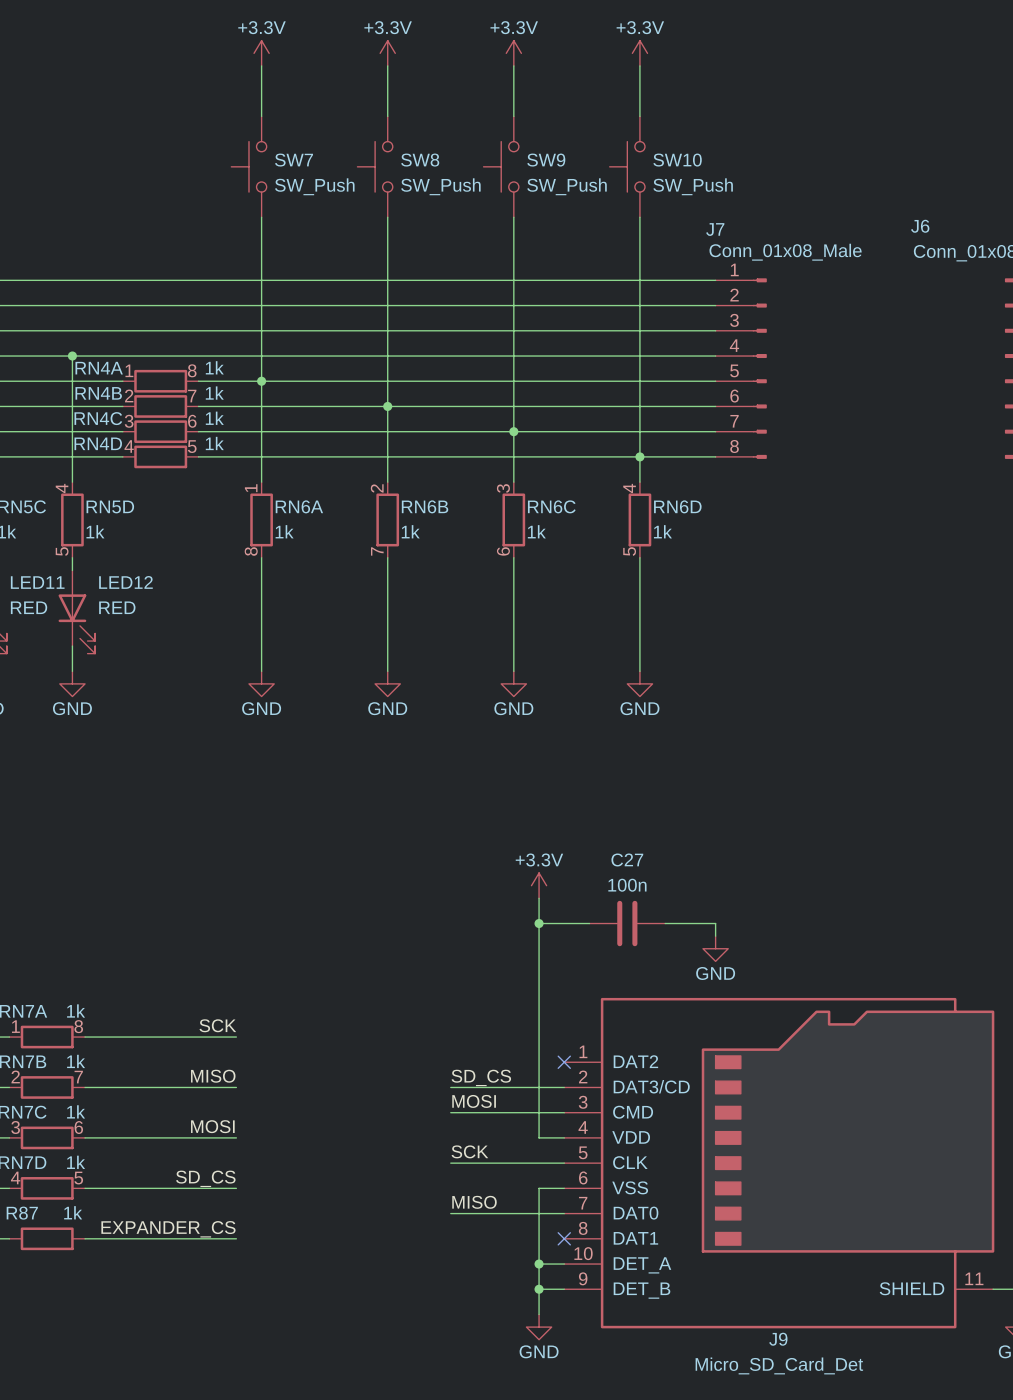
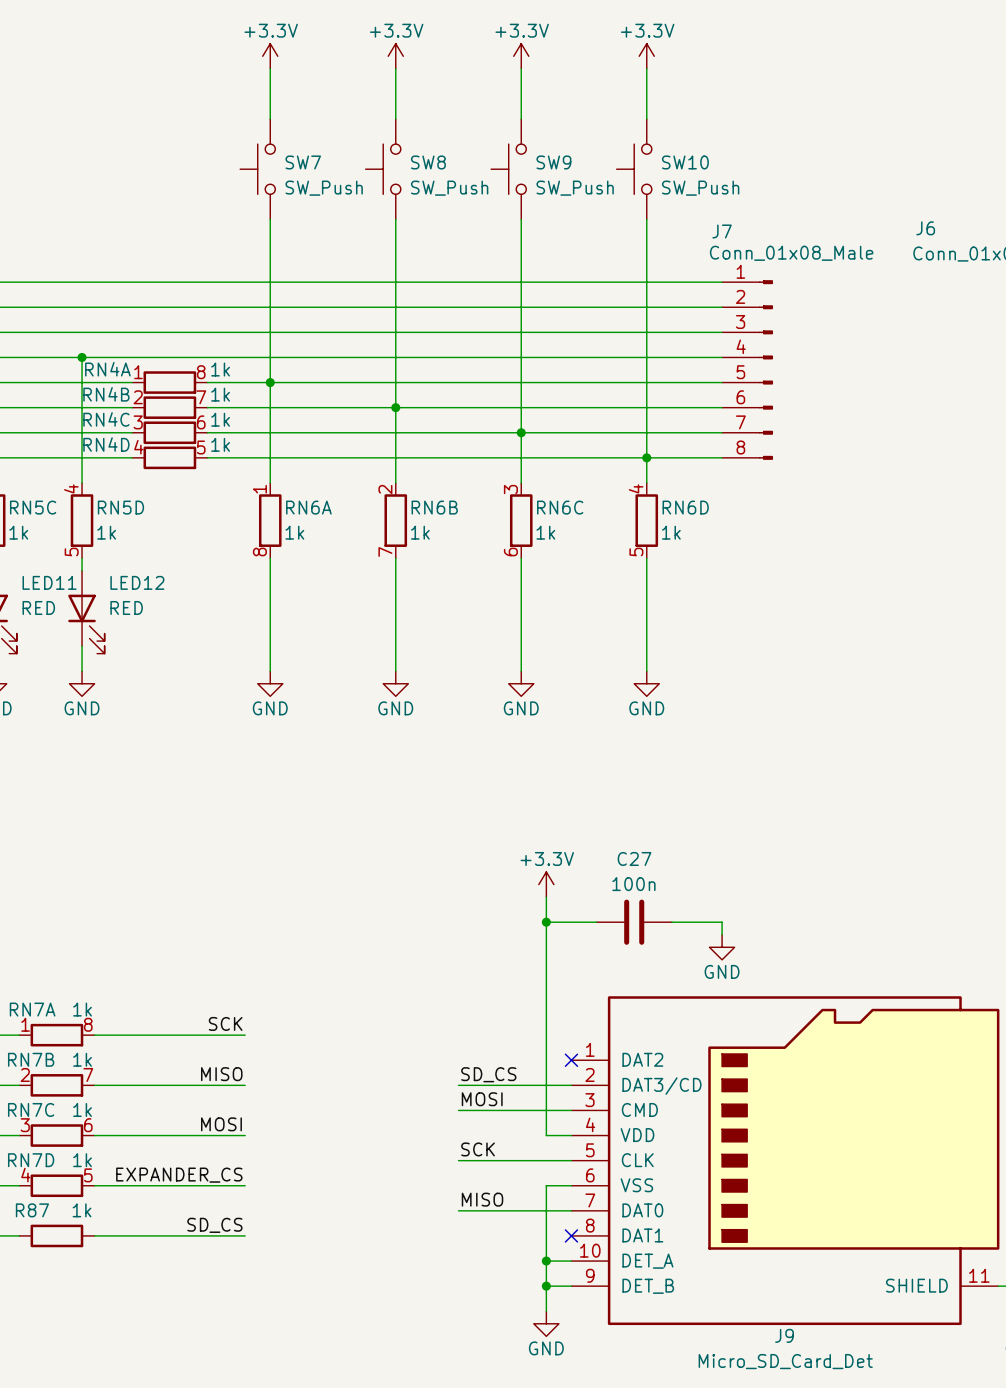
label: SD_CS (205, 1178) -> EXPANDER_CS (179, 1175)
label: EXPANDER_CS (168, 1229) -> SD_CS (214, 1225)

